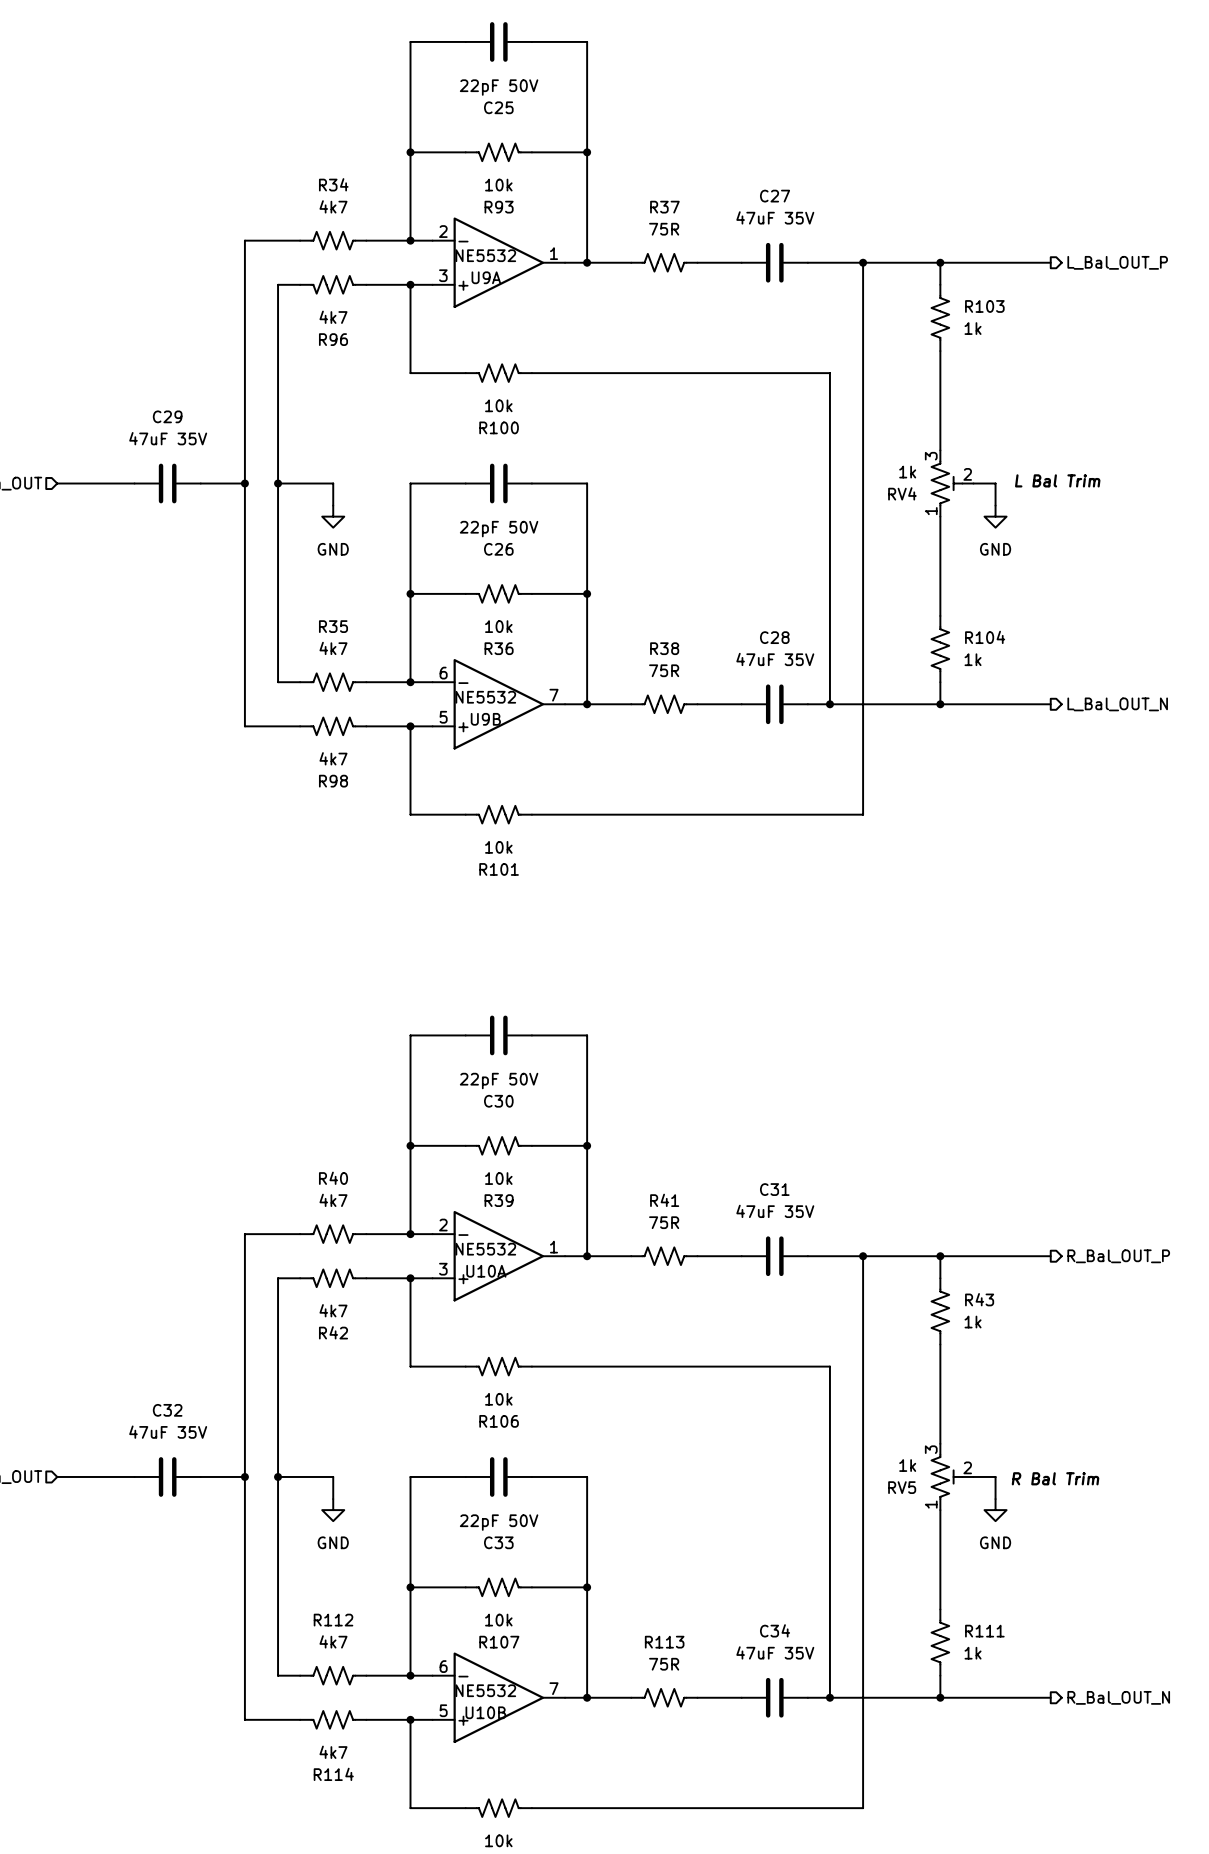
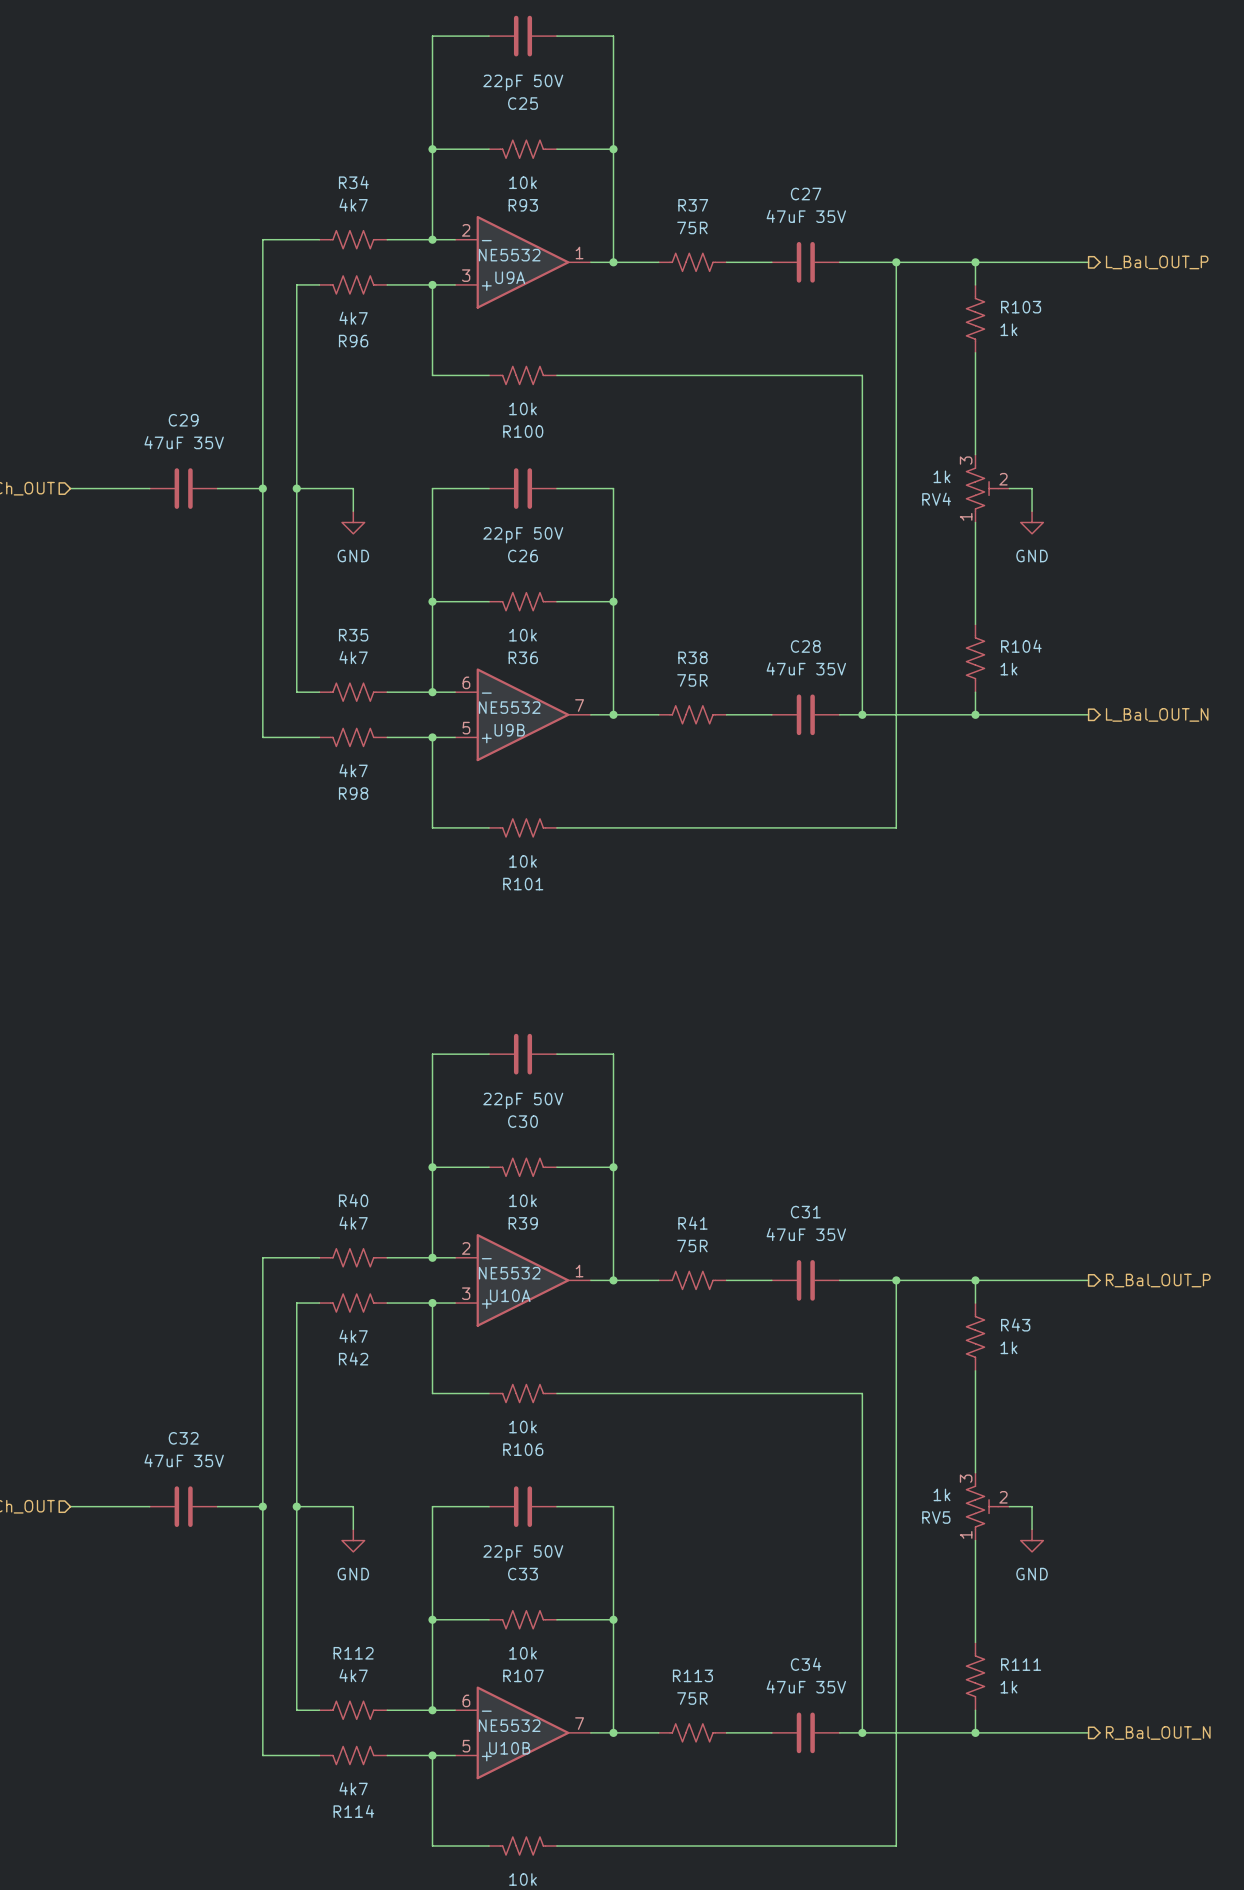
RV4 text: L Bal Trim (1057, 480) -> none
RV5 text: R Bal Trim (1055, 1478) -> none

